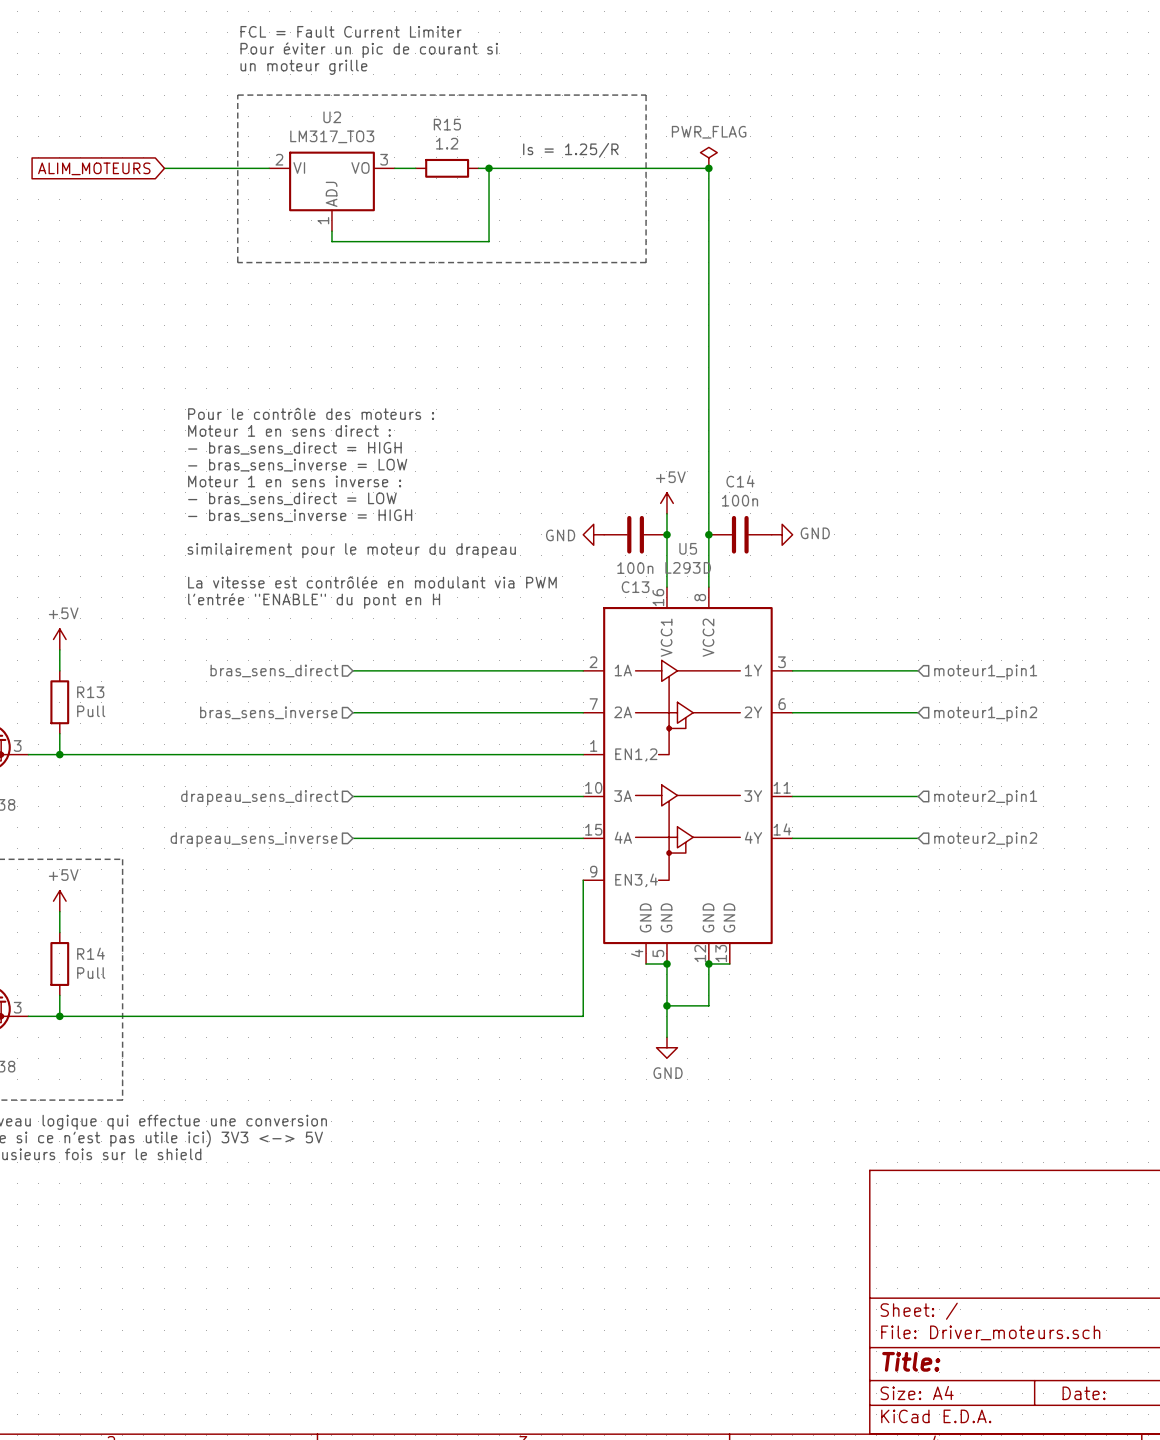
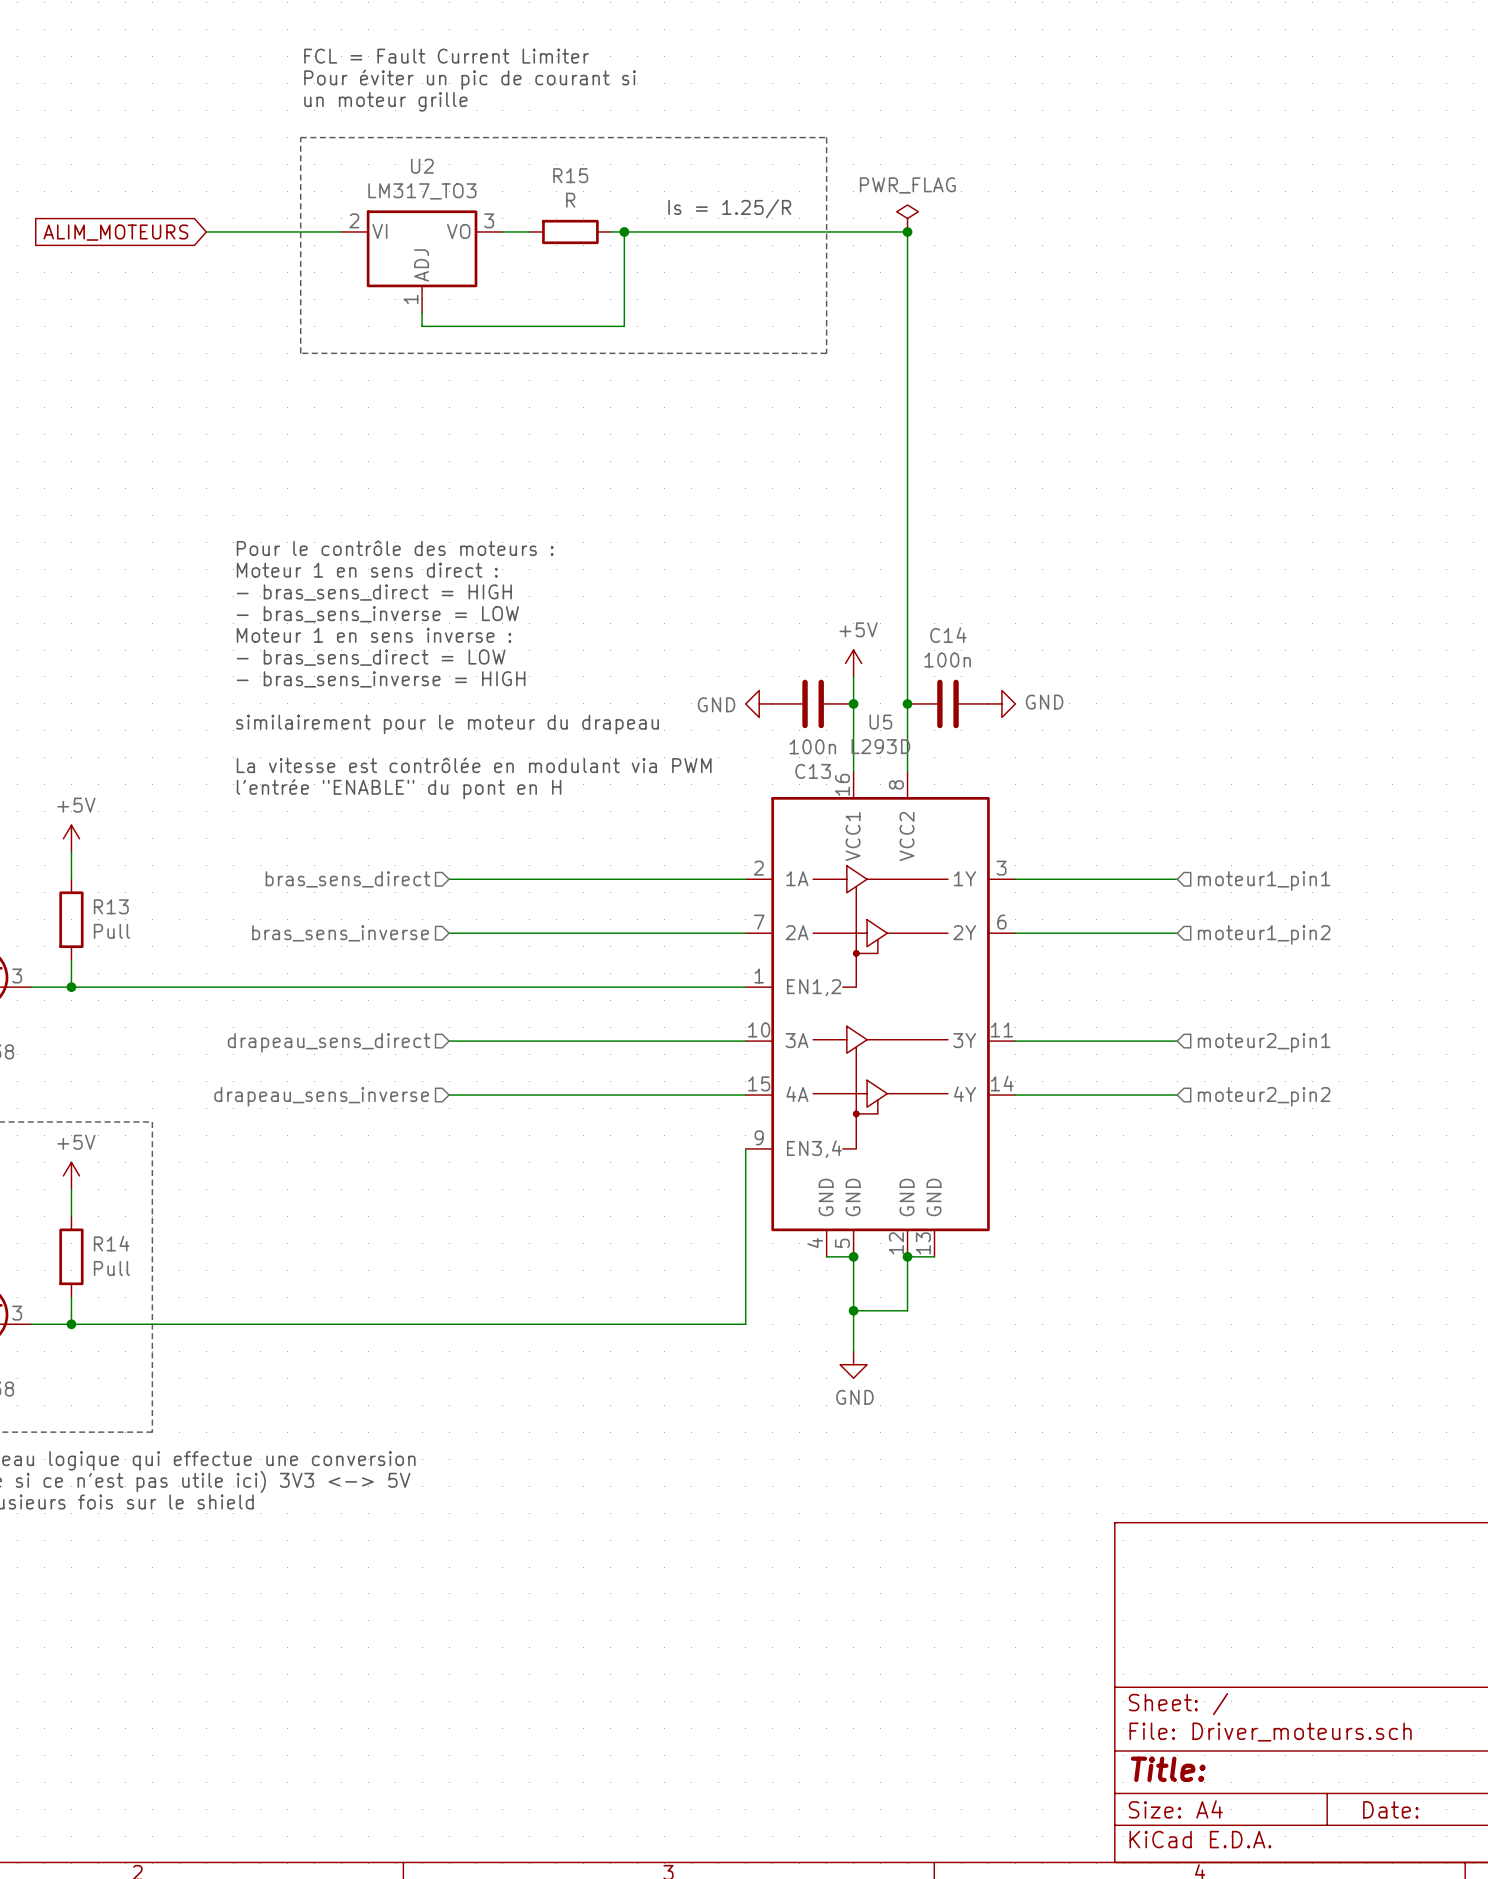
R15 value: 1.2 (447, 143) -> R (570, 200)

